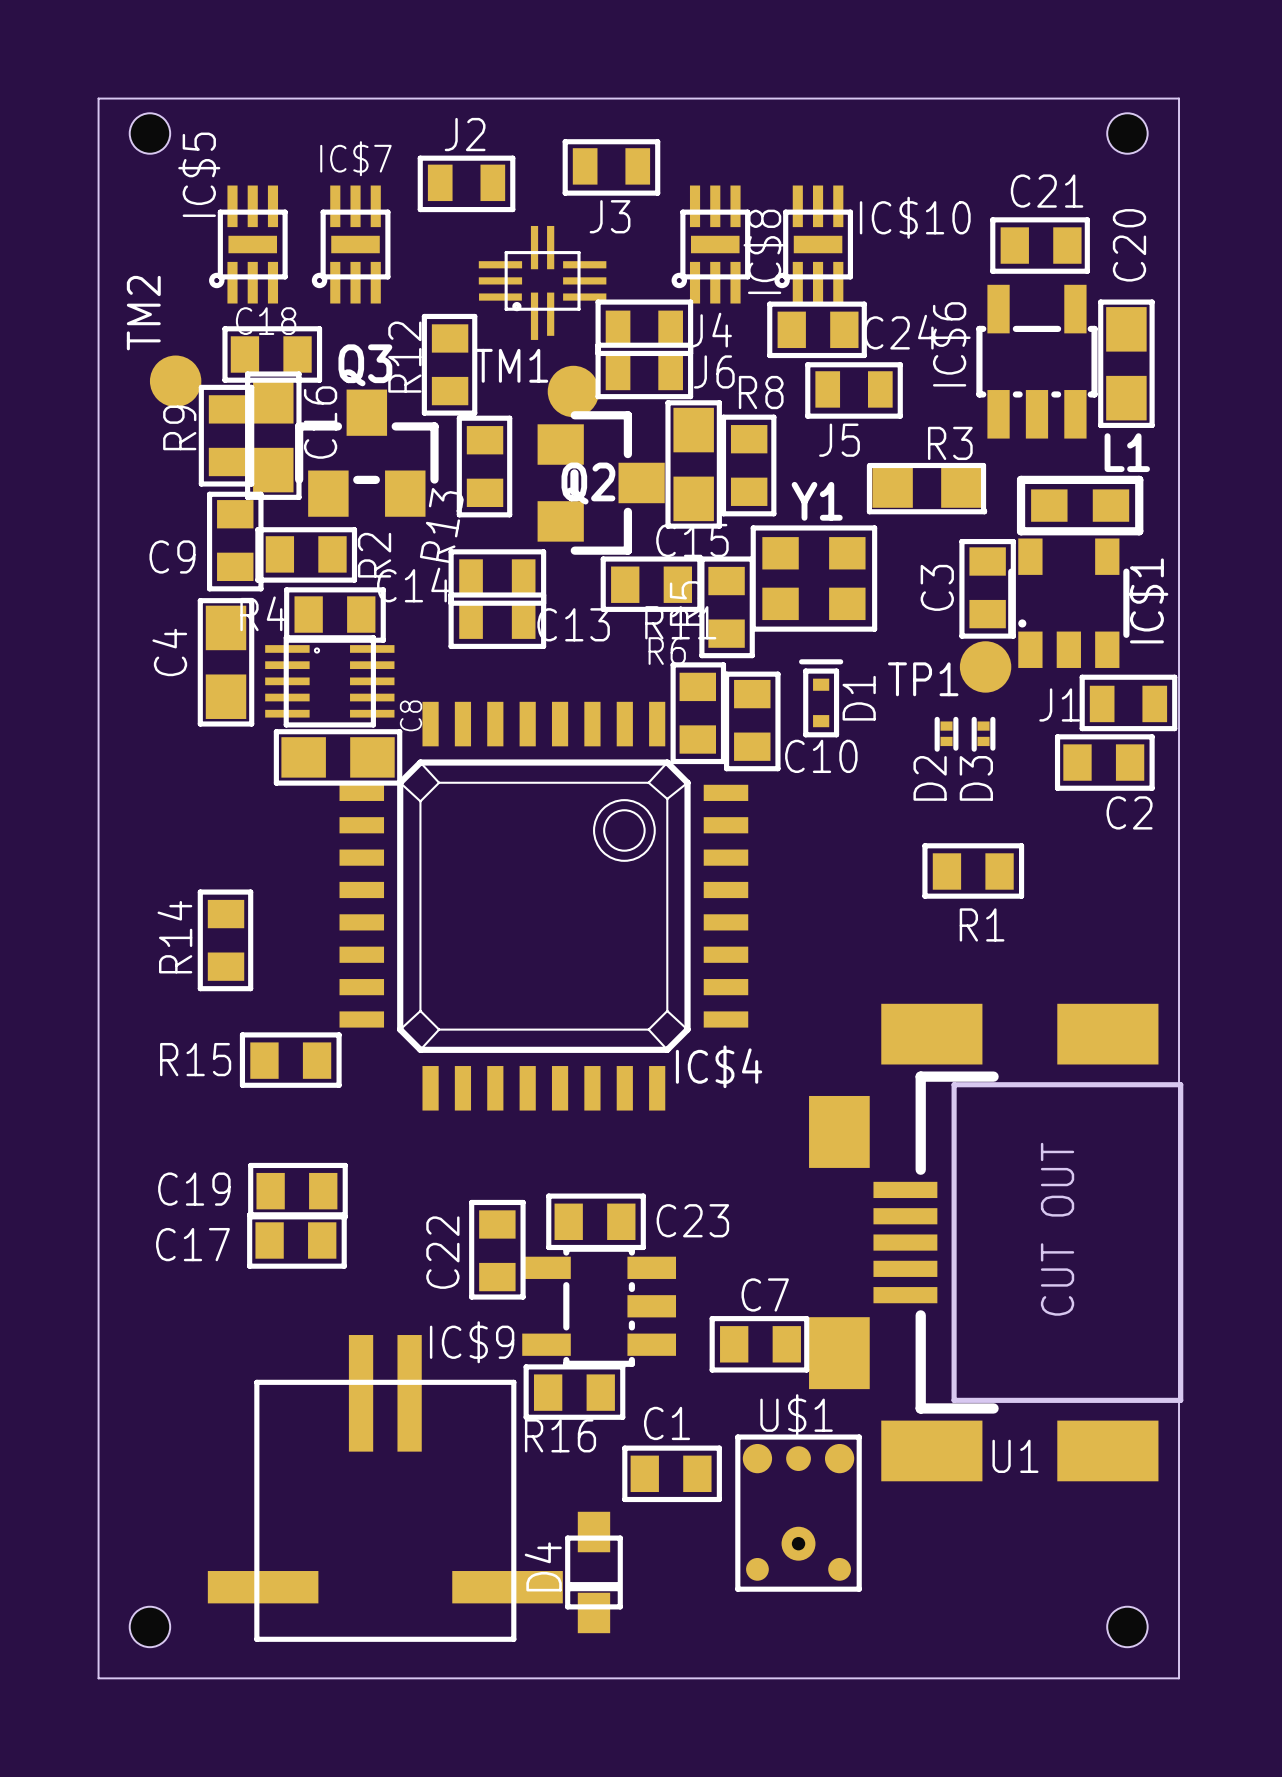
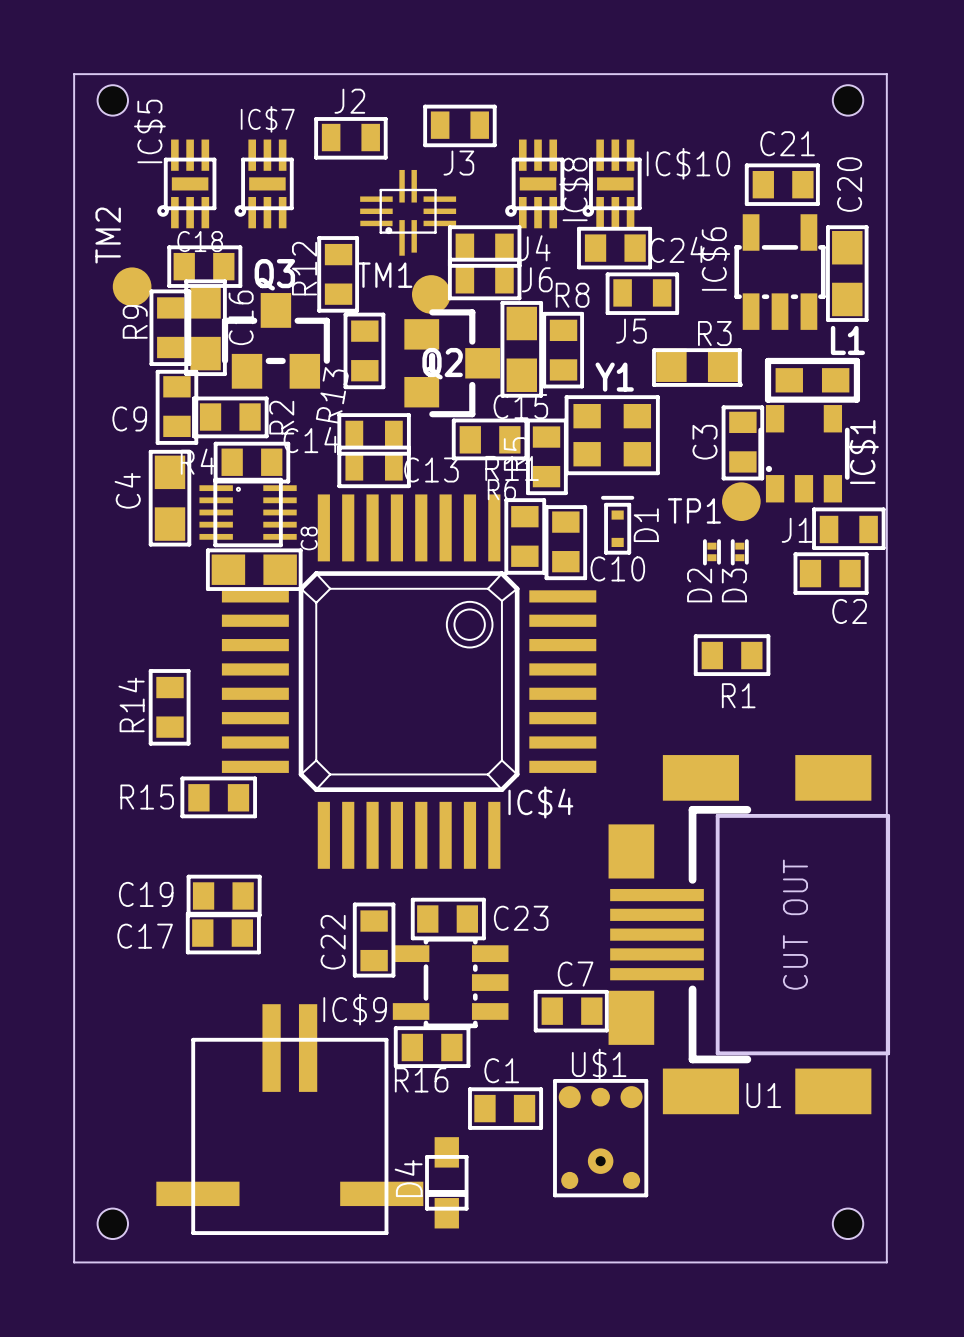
IC$4 footprint: [339, 701, 749, 1111] -> [221, 494, 597, 869]
U1 footprint: [809, 1003, 1184, 1482] -> [608, 755, 891, 1115]

